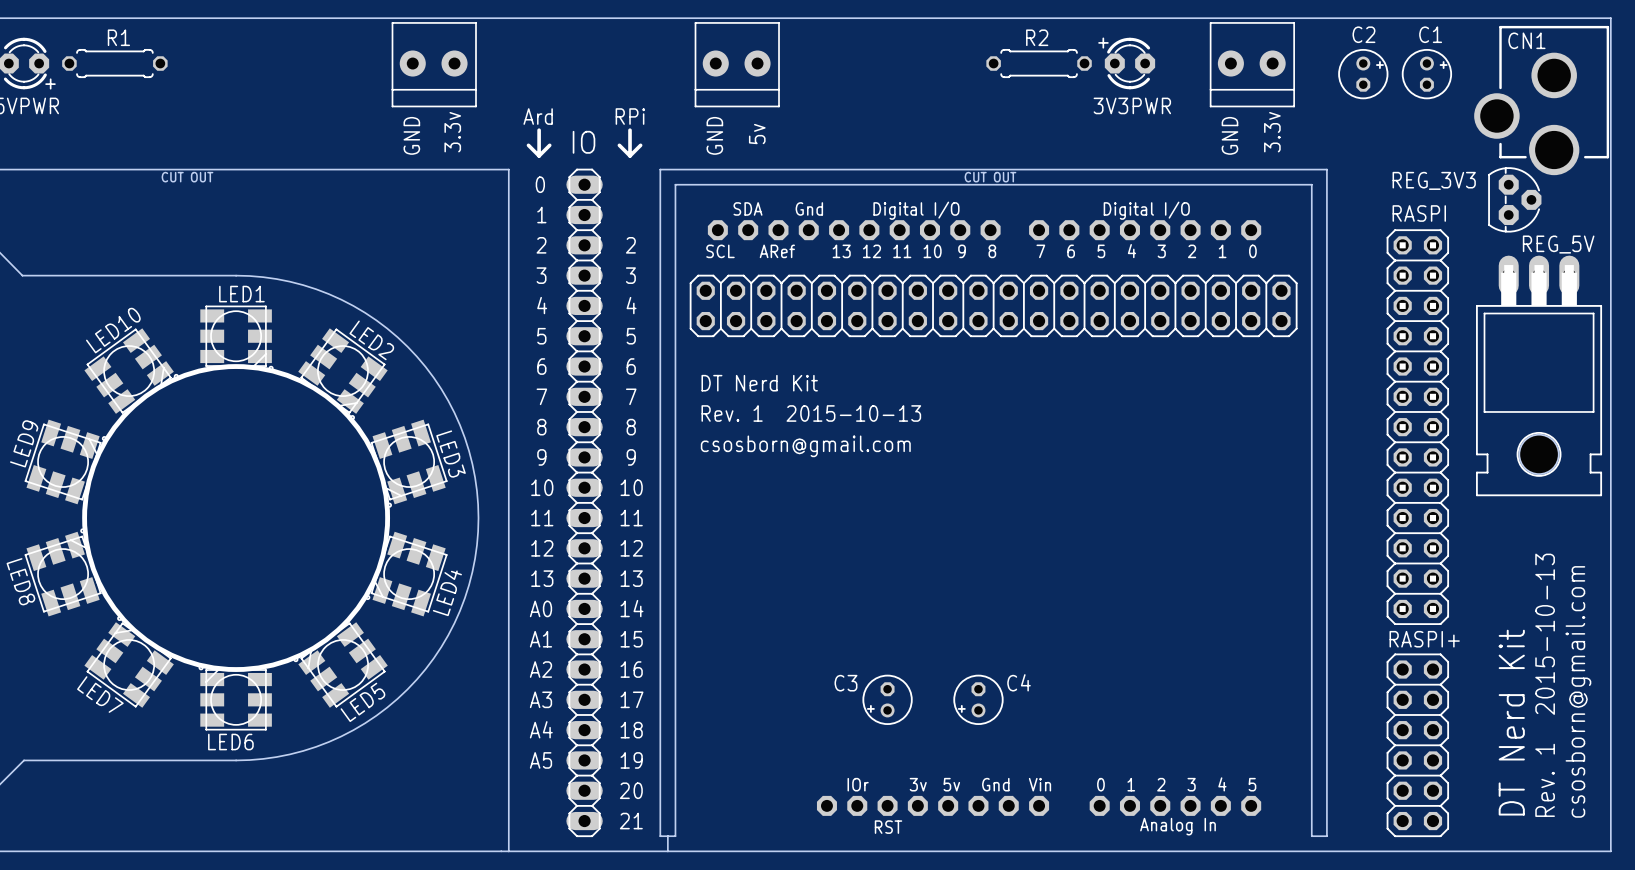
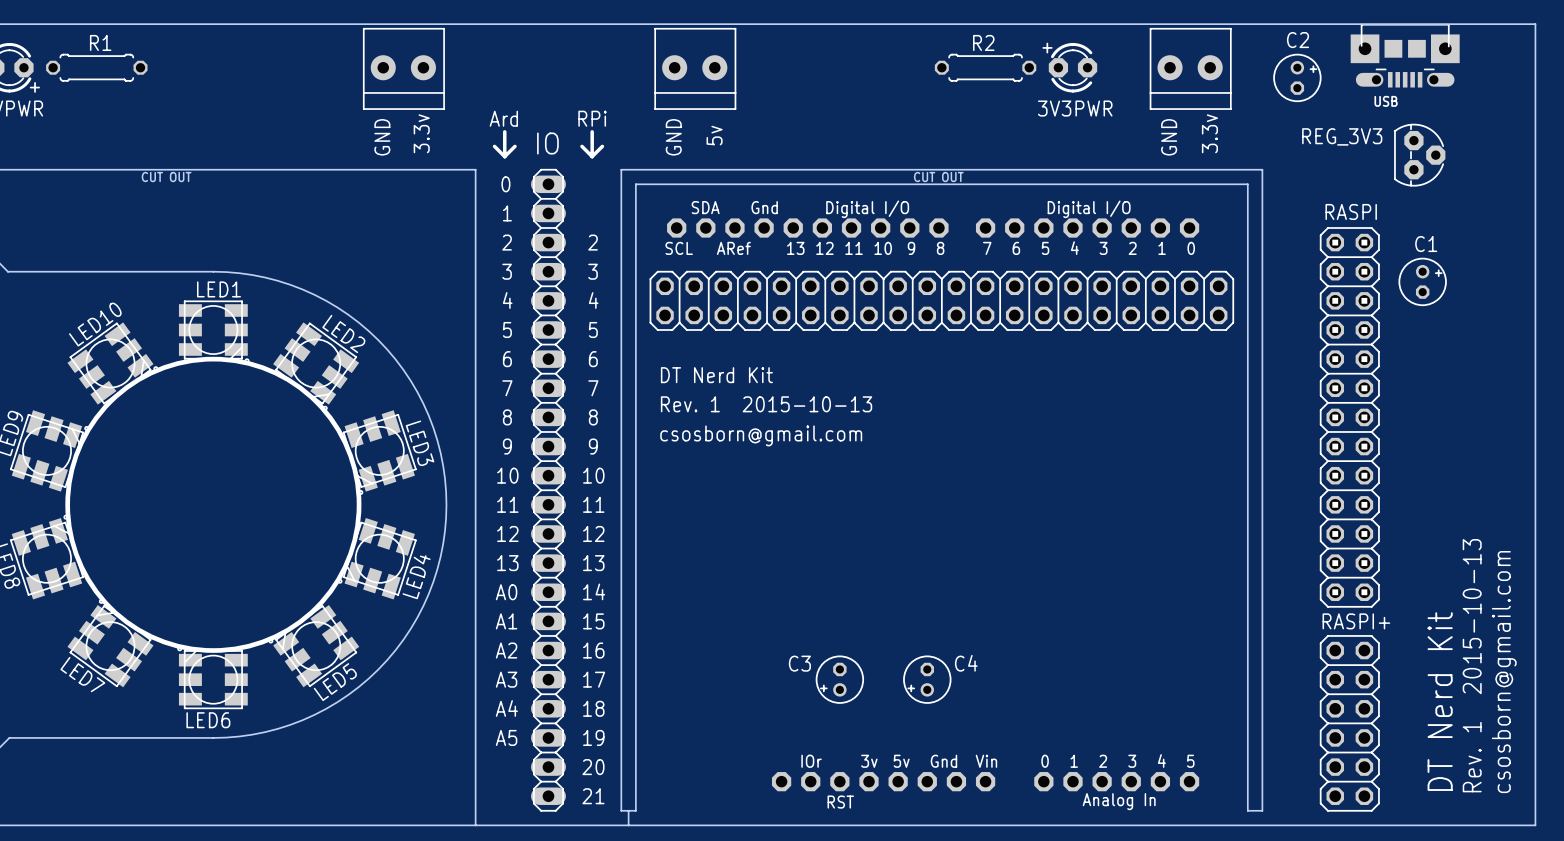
USB: none -> (1405, 55)
C1 position: (1426, 74) -> (1422, 281)
CN1: (1541, 100) -> none
REG_3V3 position: (1514, 199) -> (1419, 155)
REG_5V: (1539, 375) -> none

